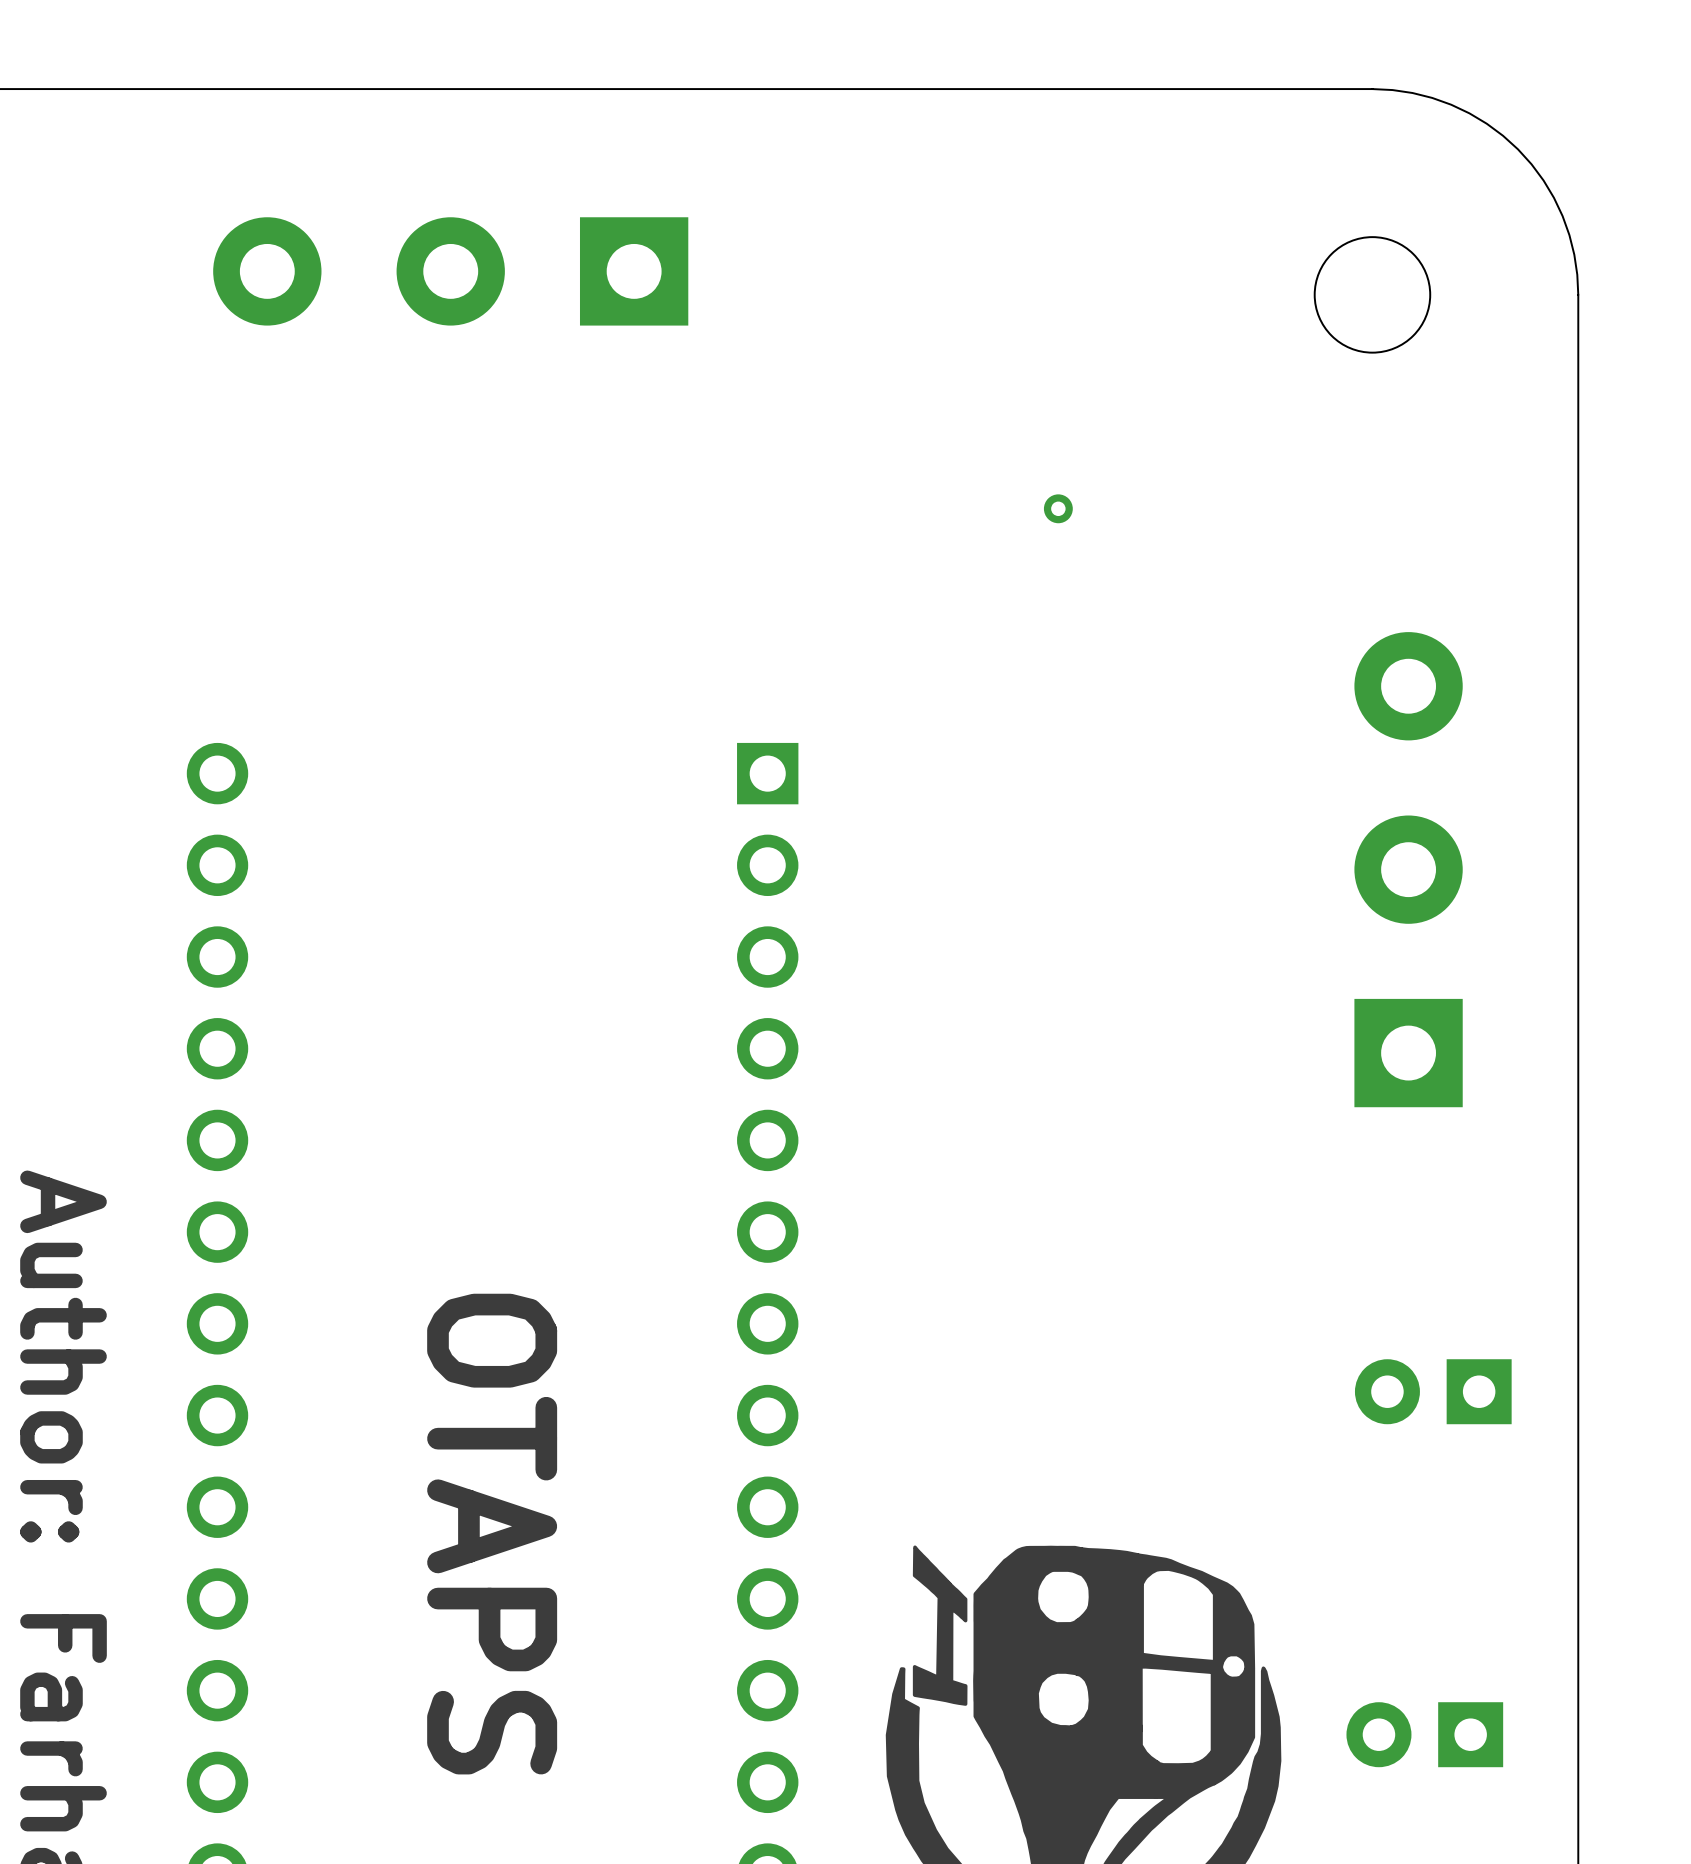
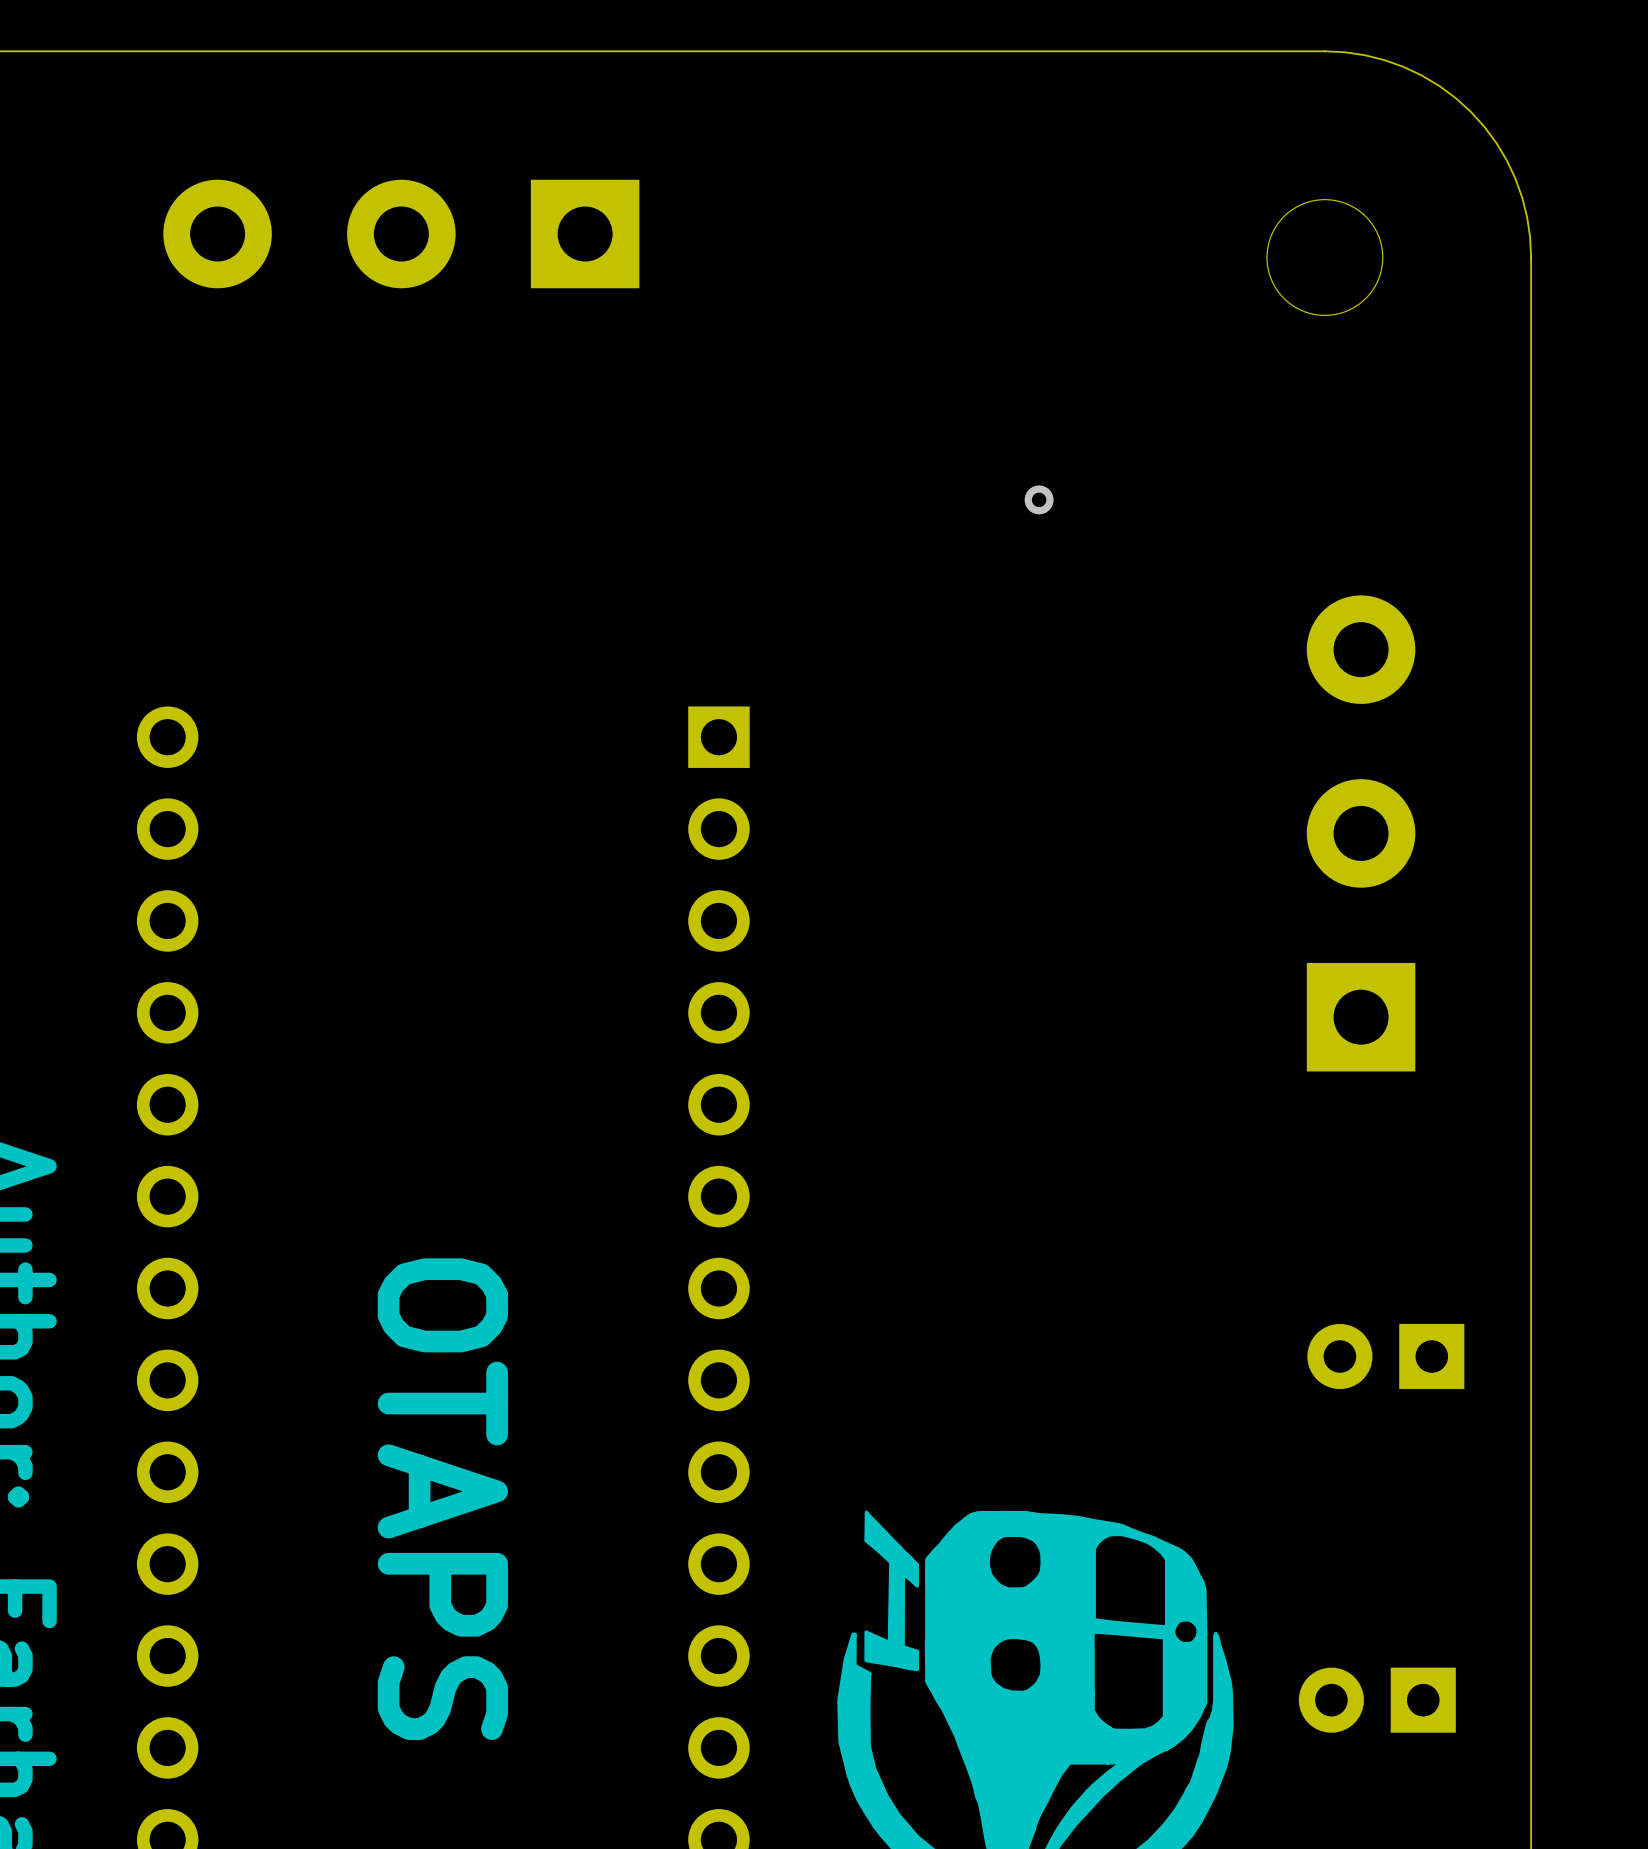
via position: (1058, 508) -> (1039, 499)

